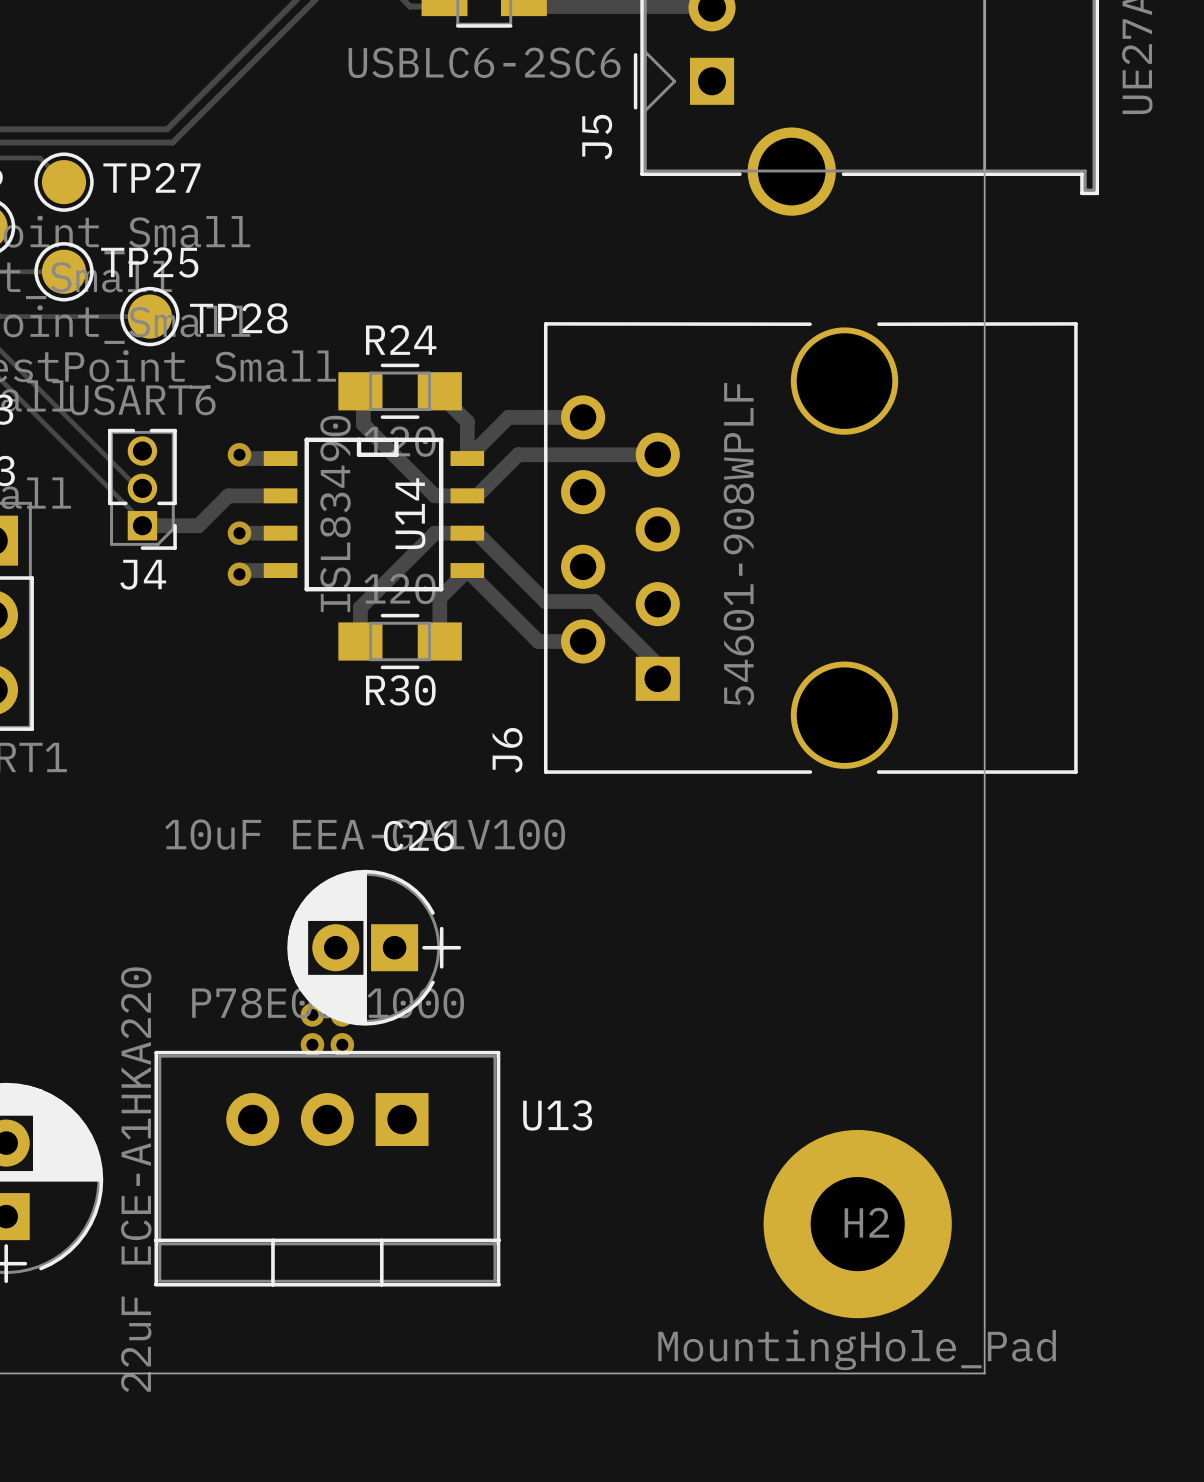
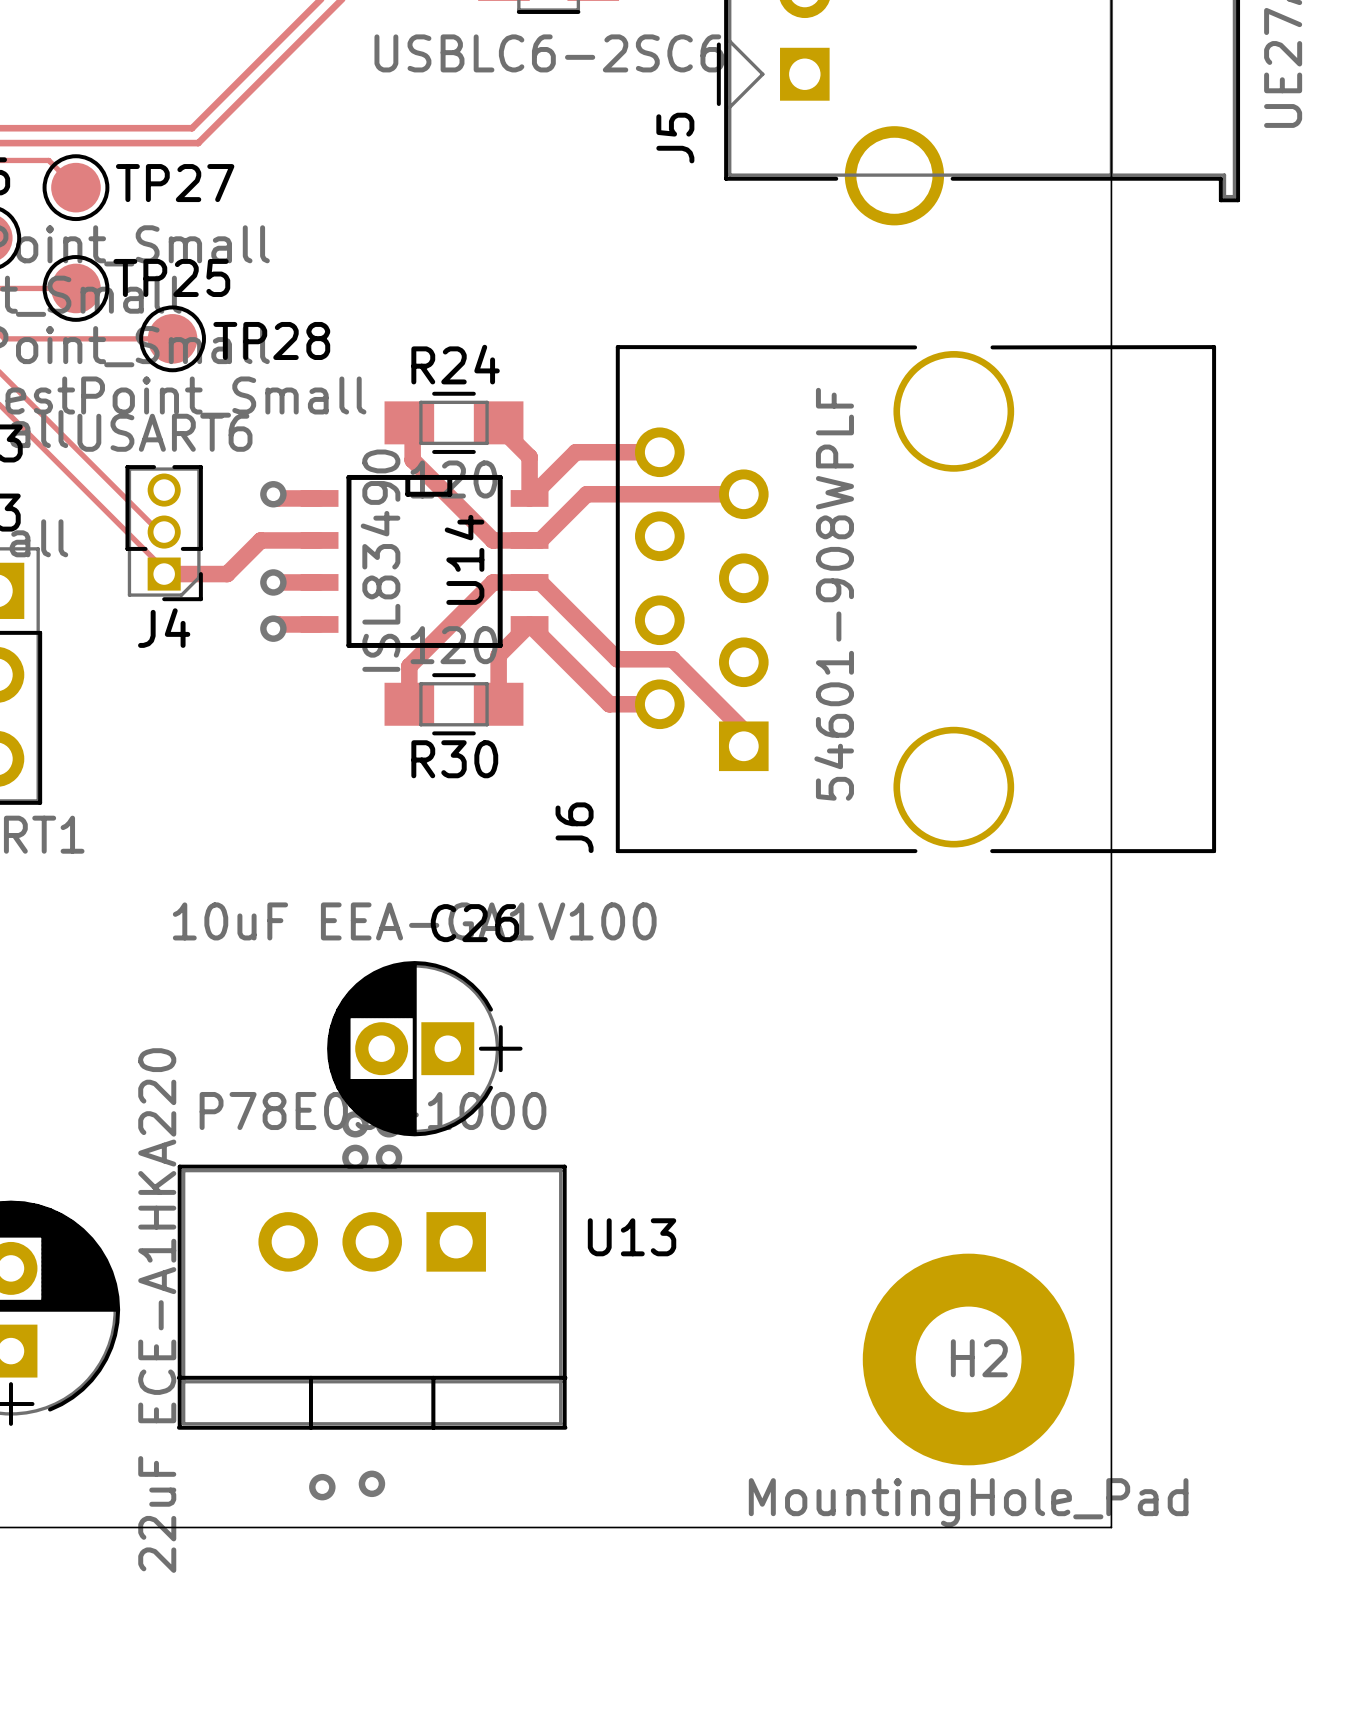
via: none -> (371, 1483)
via: none -> (322, 1487)

